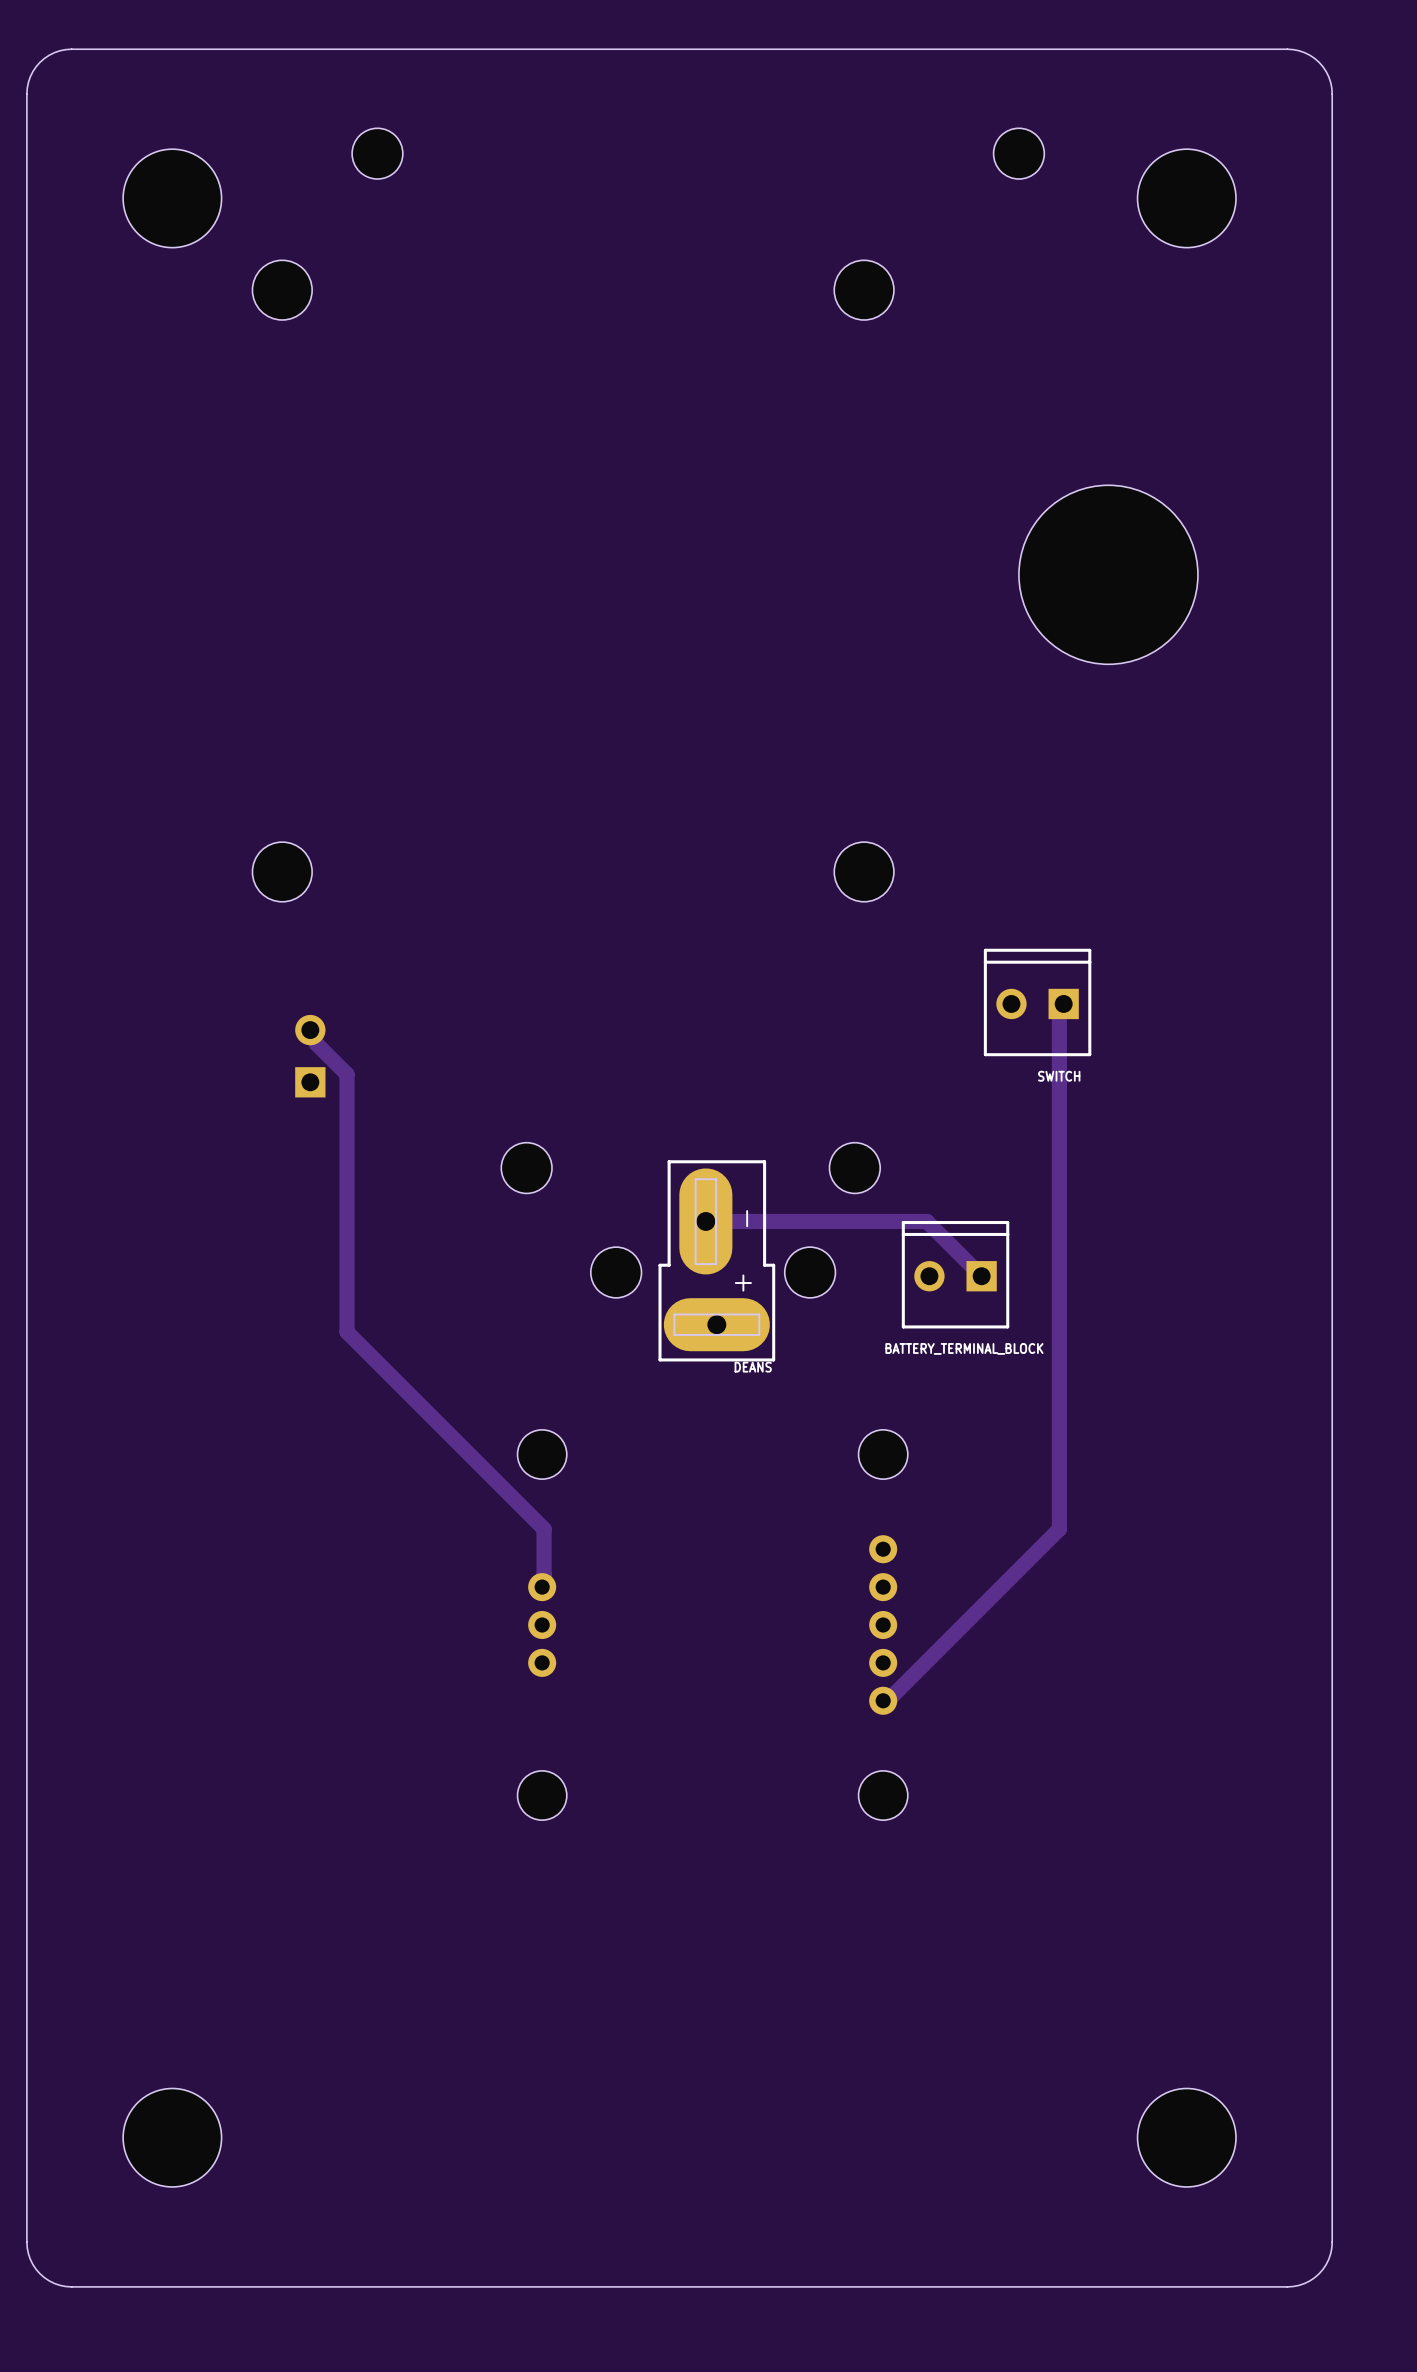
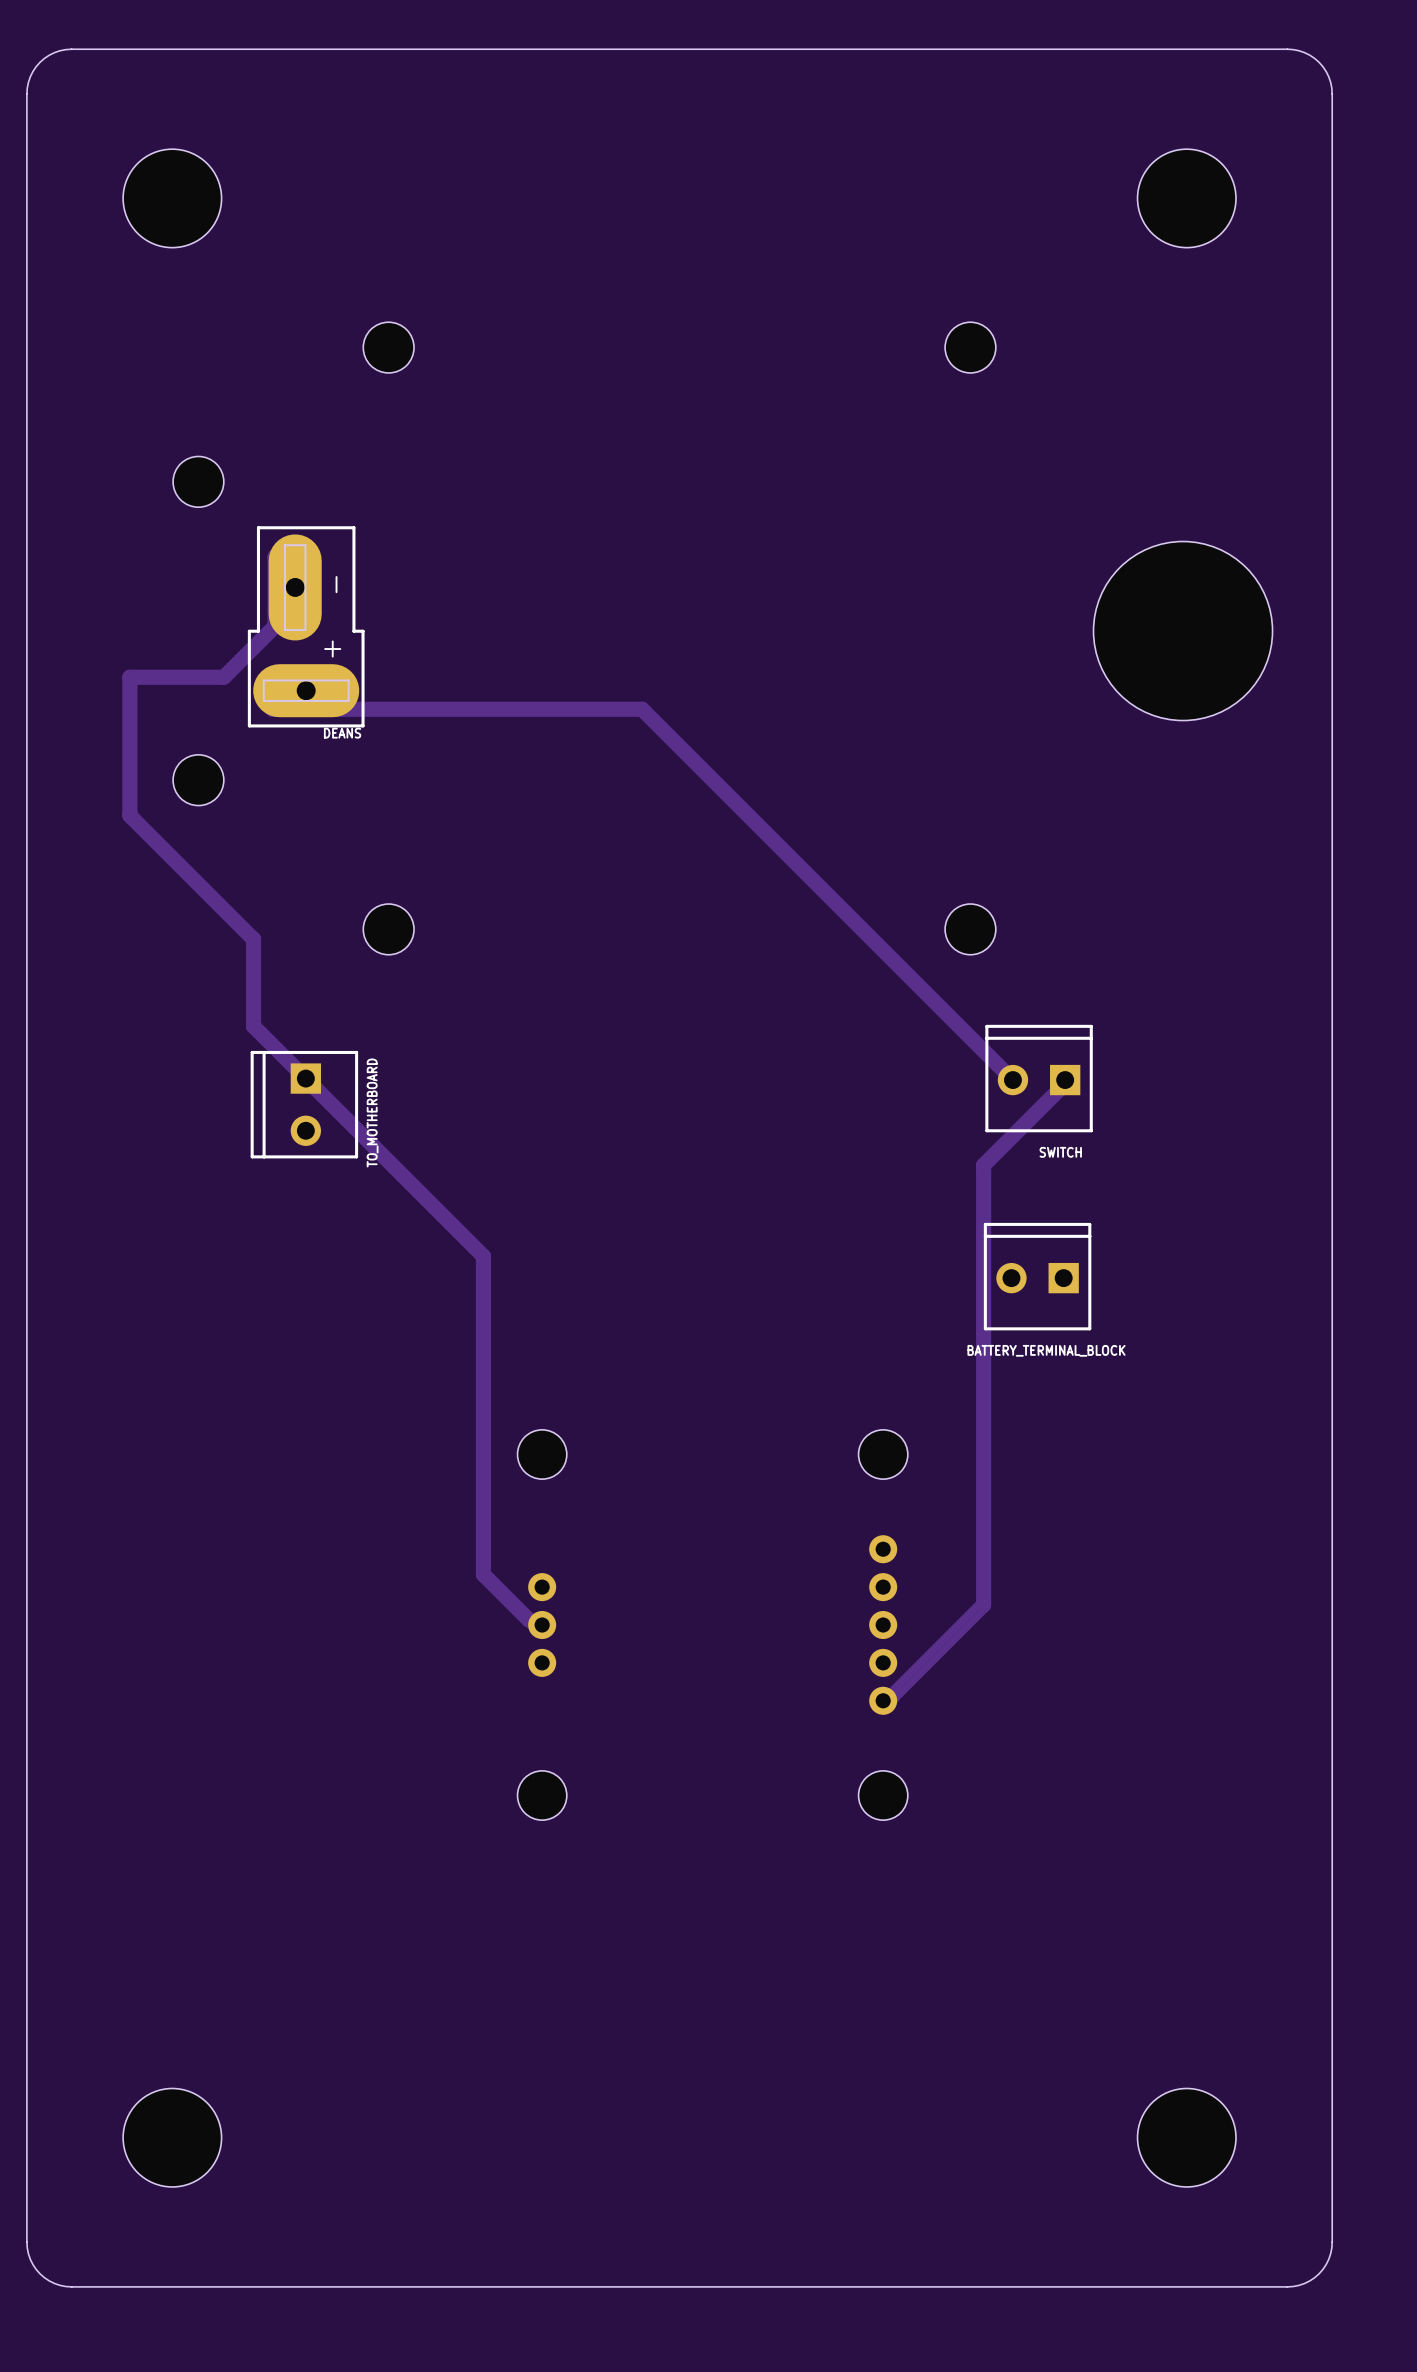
hole: (377, 153) -> none
hole position: (1018, 153) -> (970, 347)
hole: (282, 290) -> none
hole: (864, 290) -> none
hole: none -> (388, 347)
hole: none -> (198, 481)
hole position: (1108, 574) -> (1183, 631)
track: none -> (295, 587) (295, 553) (286, 545) (275, 556) (275, 626) (223, 677) (129, 677) (129, 815) (253, 939) (253, 1026) (483, 1256) (483, 1574) (528, 1620) (542, 1625)
DEANS: none -> (306, 626)
track: none -> (306, 690) (291, 690) (272, 709) (642, 709) (1012, 1080)
hole: none -> (198, 780)
hole: (282, 871) -> none
hole: (864, 871) -> none
hole: none -> (388, 929)
hole: none -> (970, 929)
SWITCH position: (1037, 1002) -> (1039, 1078)
track: (1063, 1003) (1059, 1013) (1059, 1529) (983, 1604) -> (1065, 1080) (1059, 1089) (983, 1165) (983, 1604)
track: (310, 1030) (316, 1044) (347, 1074) (347, 1332) (544, 1529) (542, 1587) -> none
TO_MOTHERBOARD side: top (310, 1056) -> bottom (304, 1104)
hole: (526, 1168) -> none
hole: (854, 1168) -> none
track: (705, 1221) (926, 1221) (981, 1276) -> none
DEANS: (716, 1260) -> none
hole: (616, 1272) -> none
hole: (810, 1272) -> none
BATTERY_TERMINAL_BLOCK position: (955, 1274) -> (1037, 1276)

